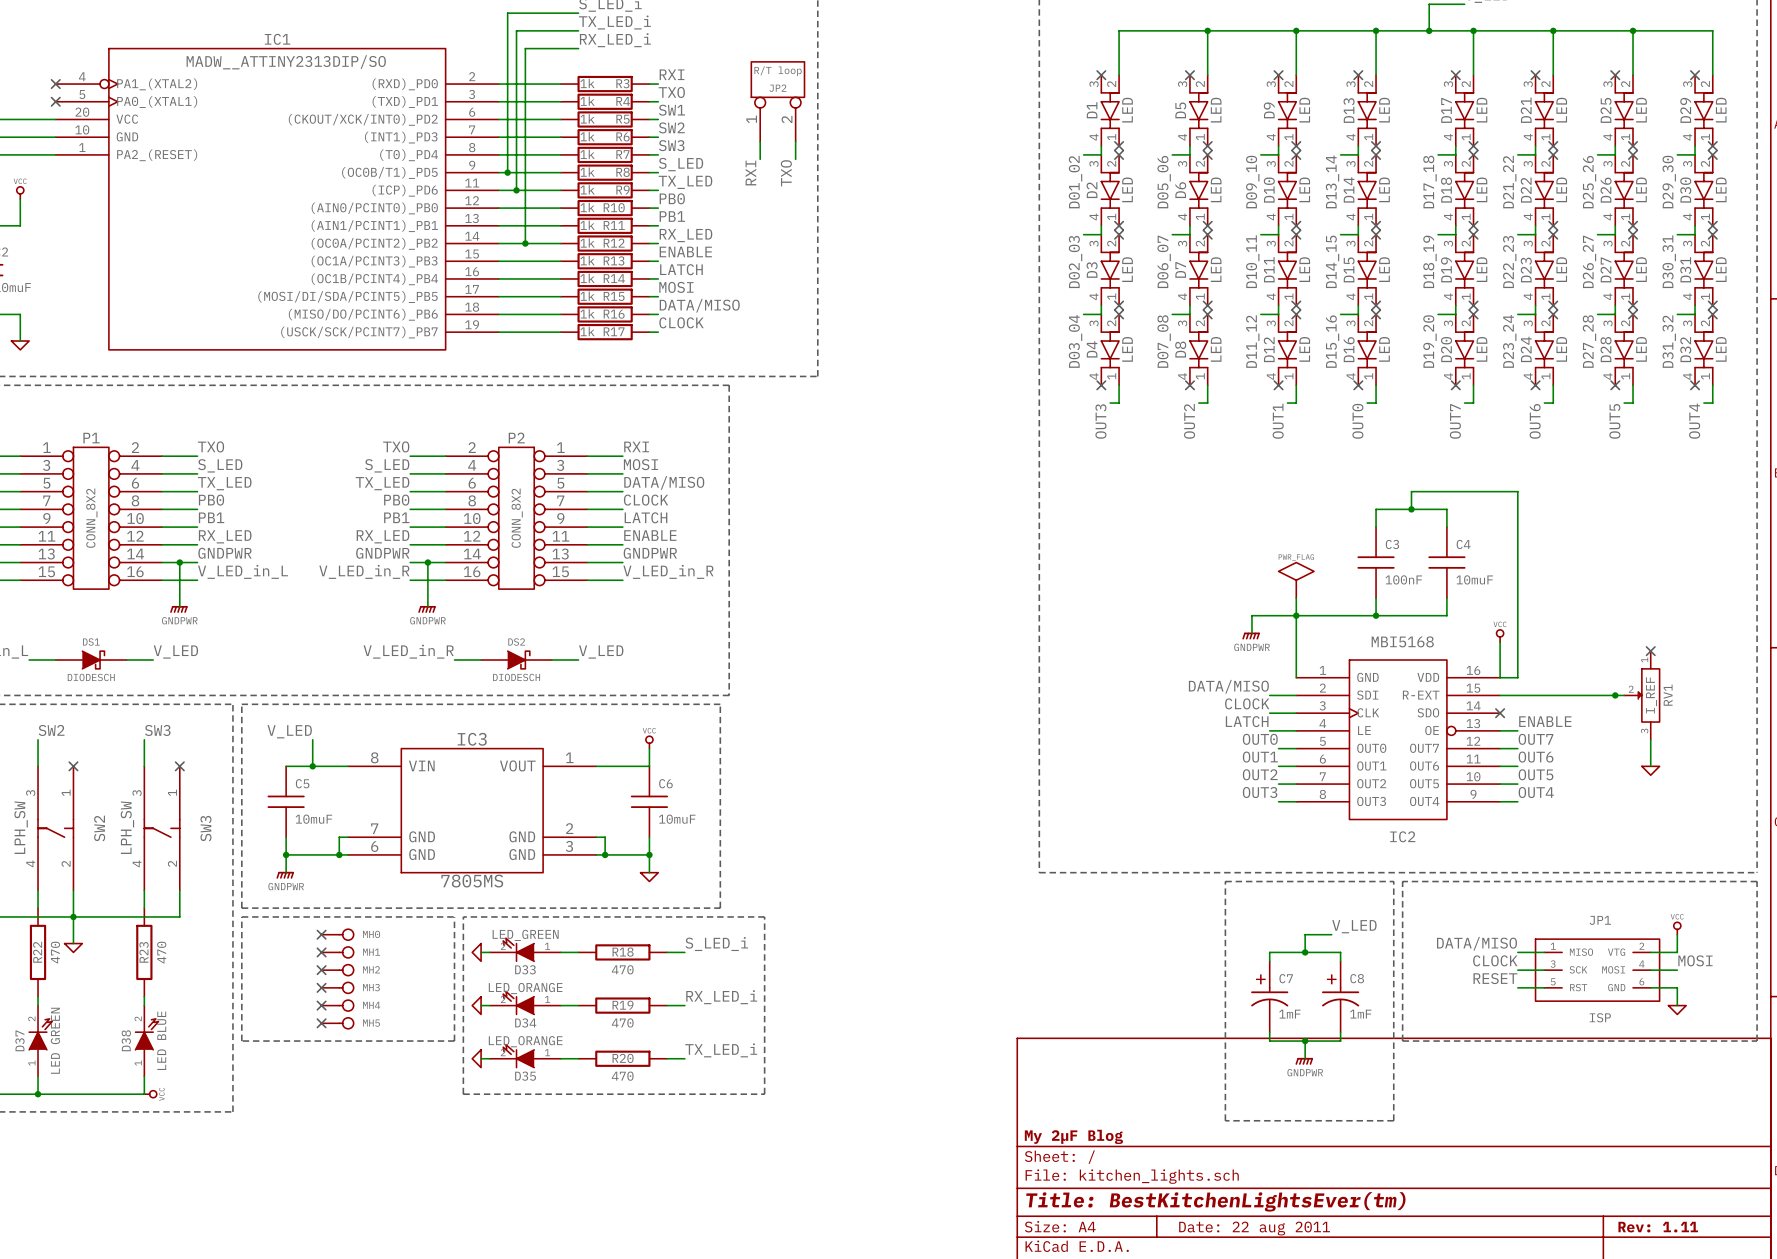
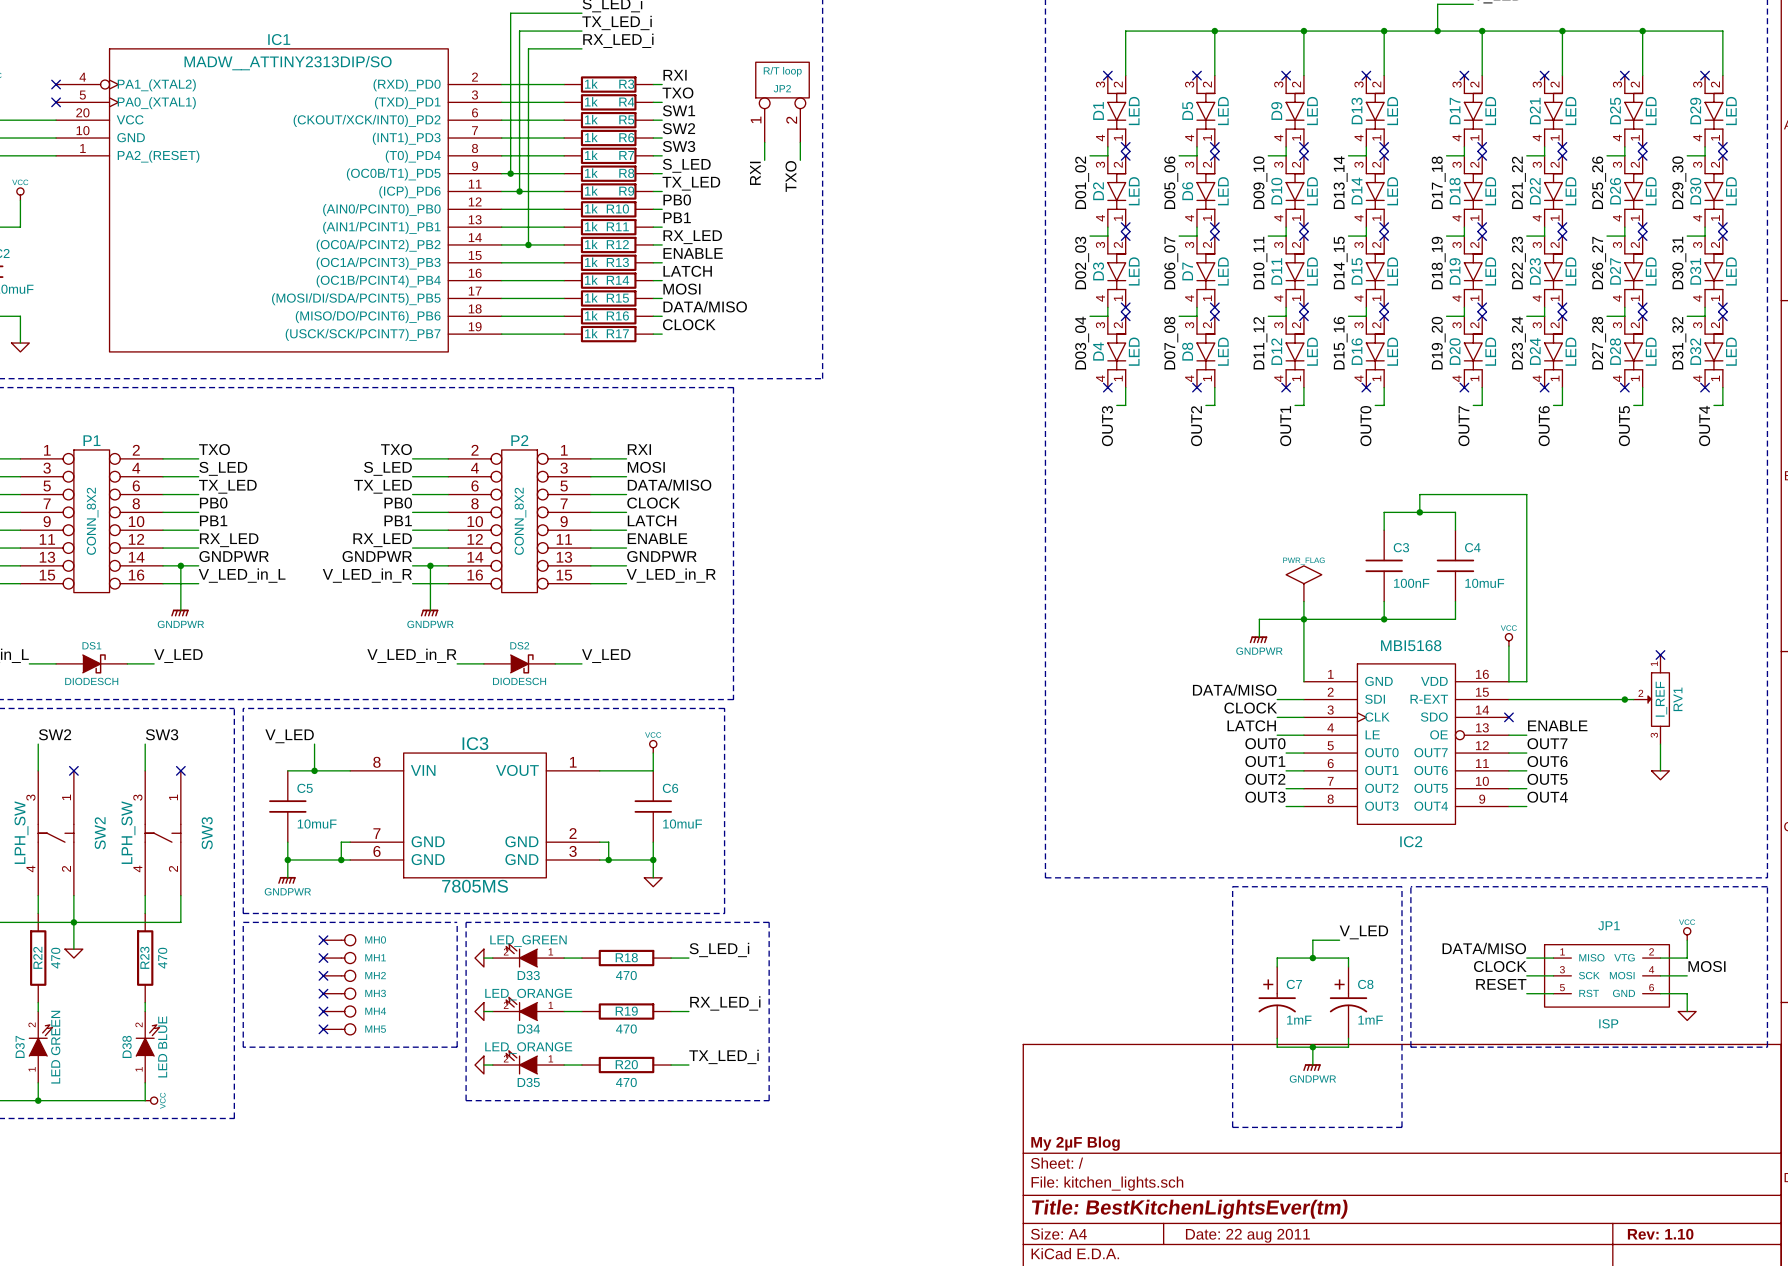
title block: Rev: 1.11 (1658, 1227) -> Rev: 1.10 (1660, 1234)

